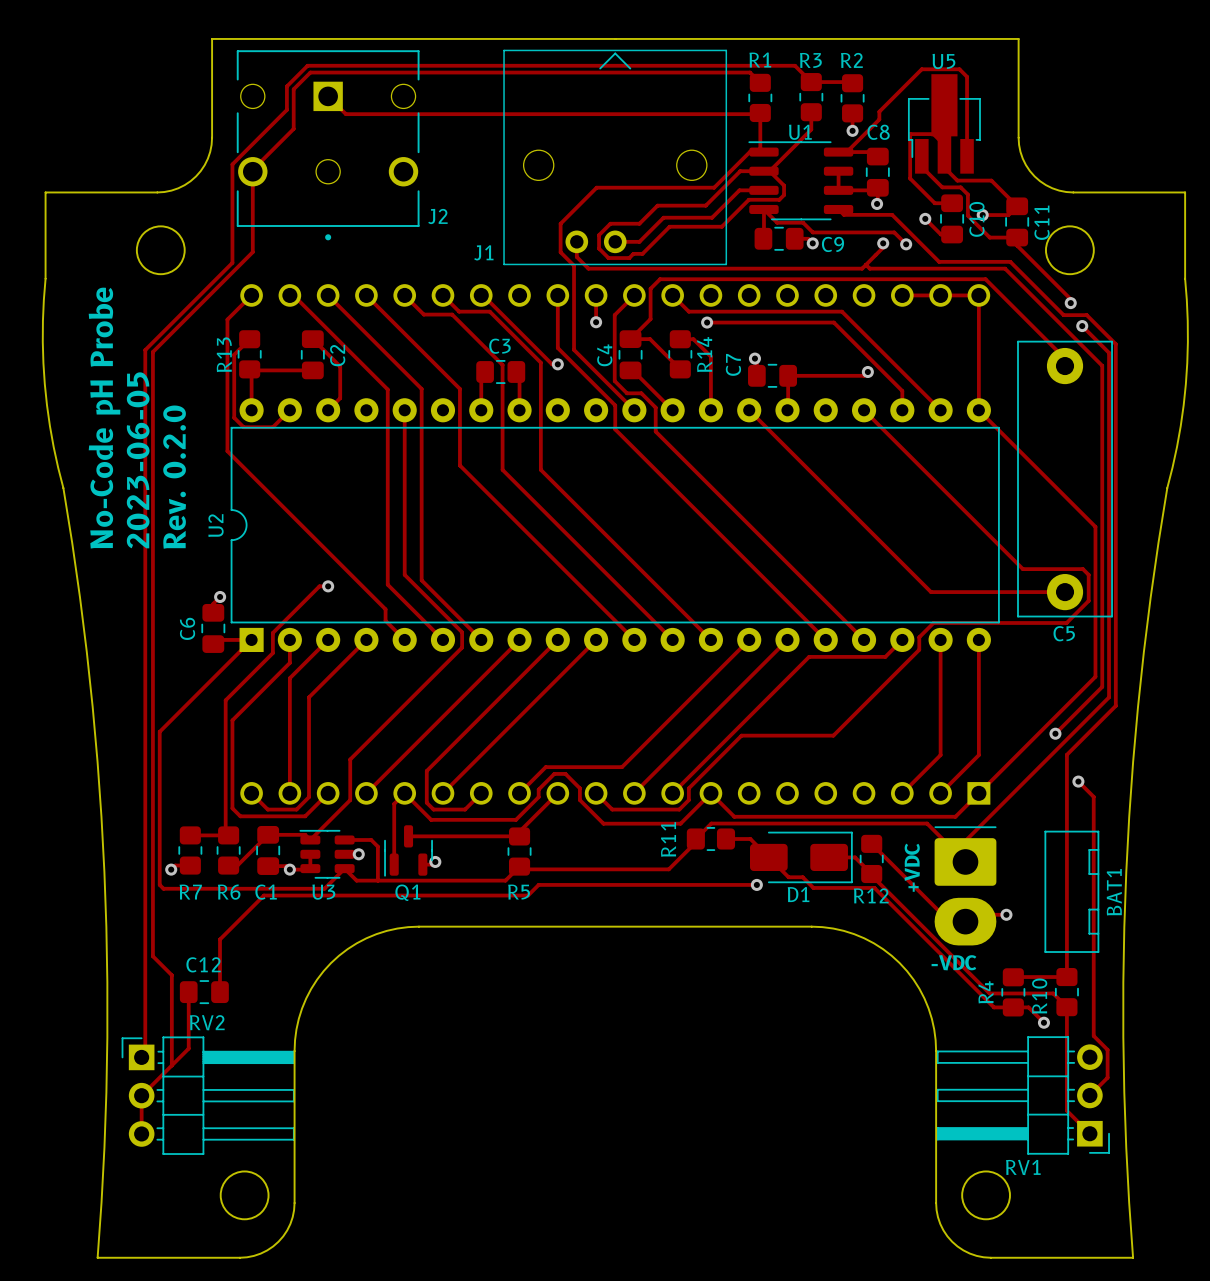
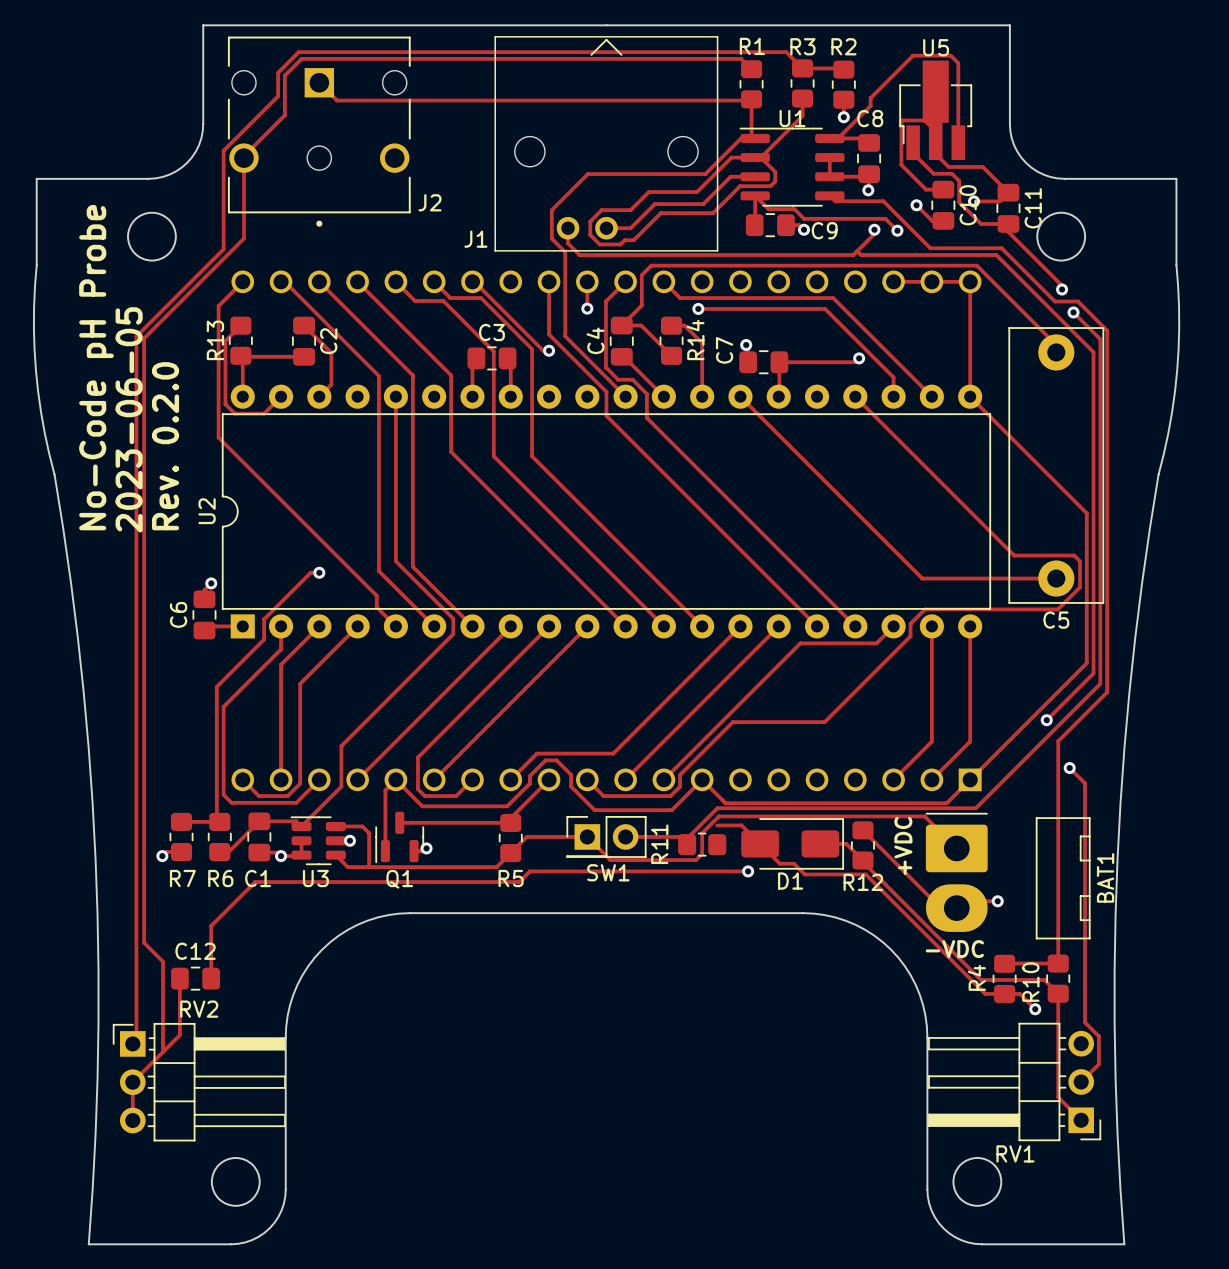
track: (251, 639) (159, 731) (159, 884) (163, 888) (324, 888) (344, 868) -> none
track: (984, 821) (965, 840) (965, 861) -> (975, 808) (717, 808) (687, 838) (687, 844) (679, 836) (625, 836)
track: (933, 829) (927, 823) (711, 823) (668, 869) (519, 869) -> (924, 816) (718, 816) (702, 833) (702, 853) (695, 860) (610, 860) (587, 836) (526, 836) (510, 853)
R11 position: (710, 838) -> (702, 844)
SW1: none -> (606, 836)

